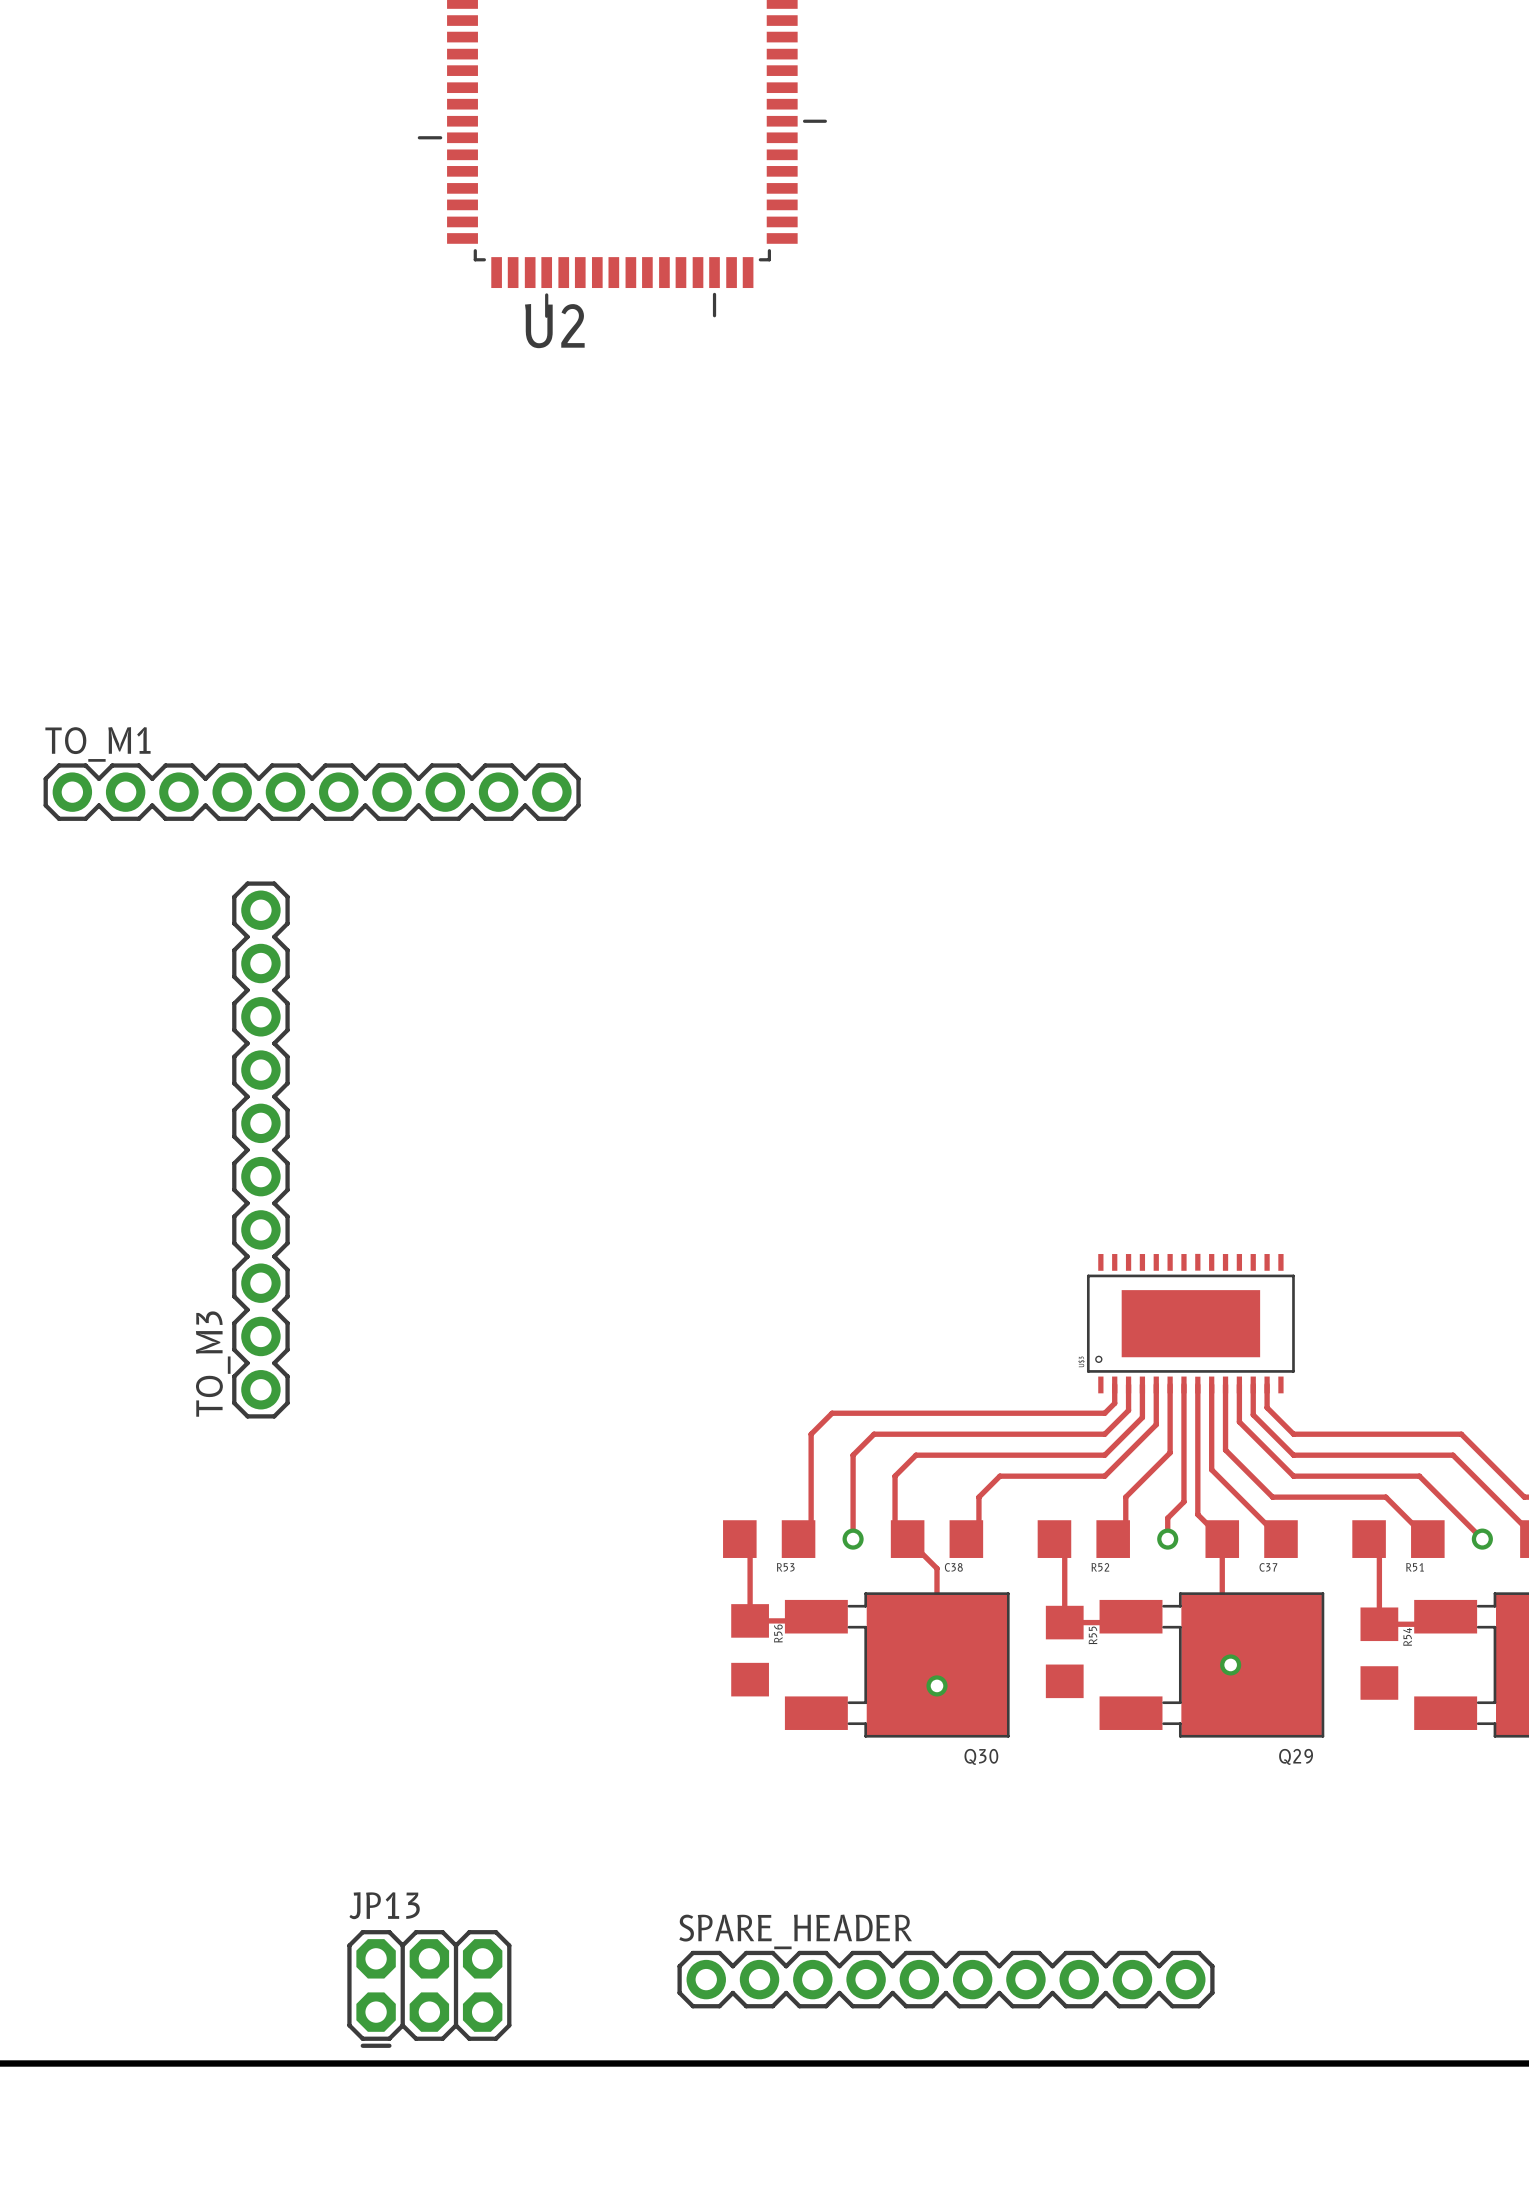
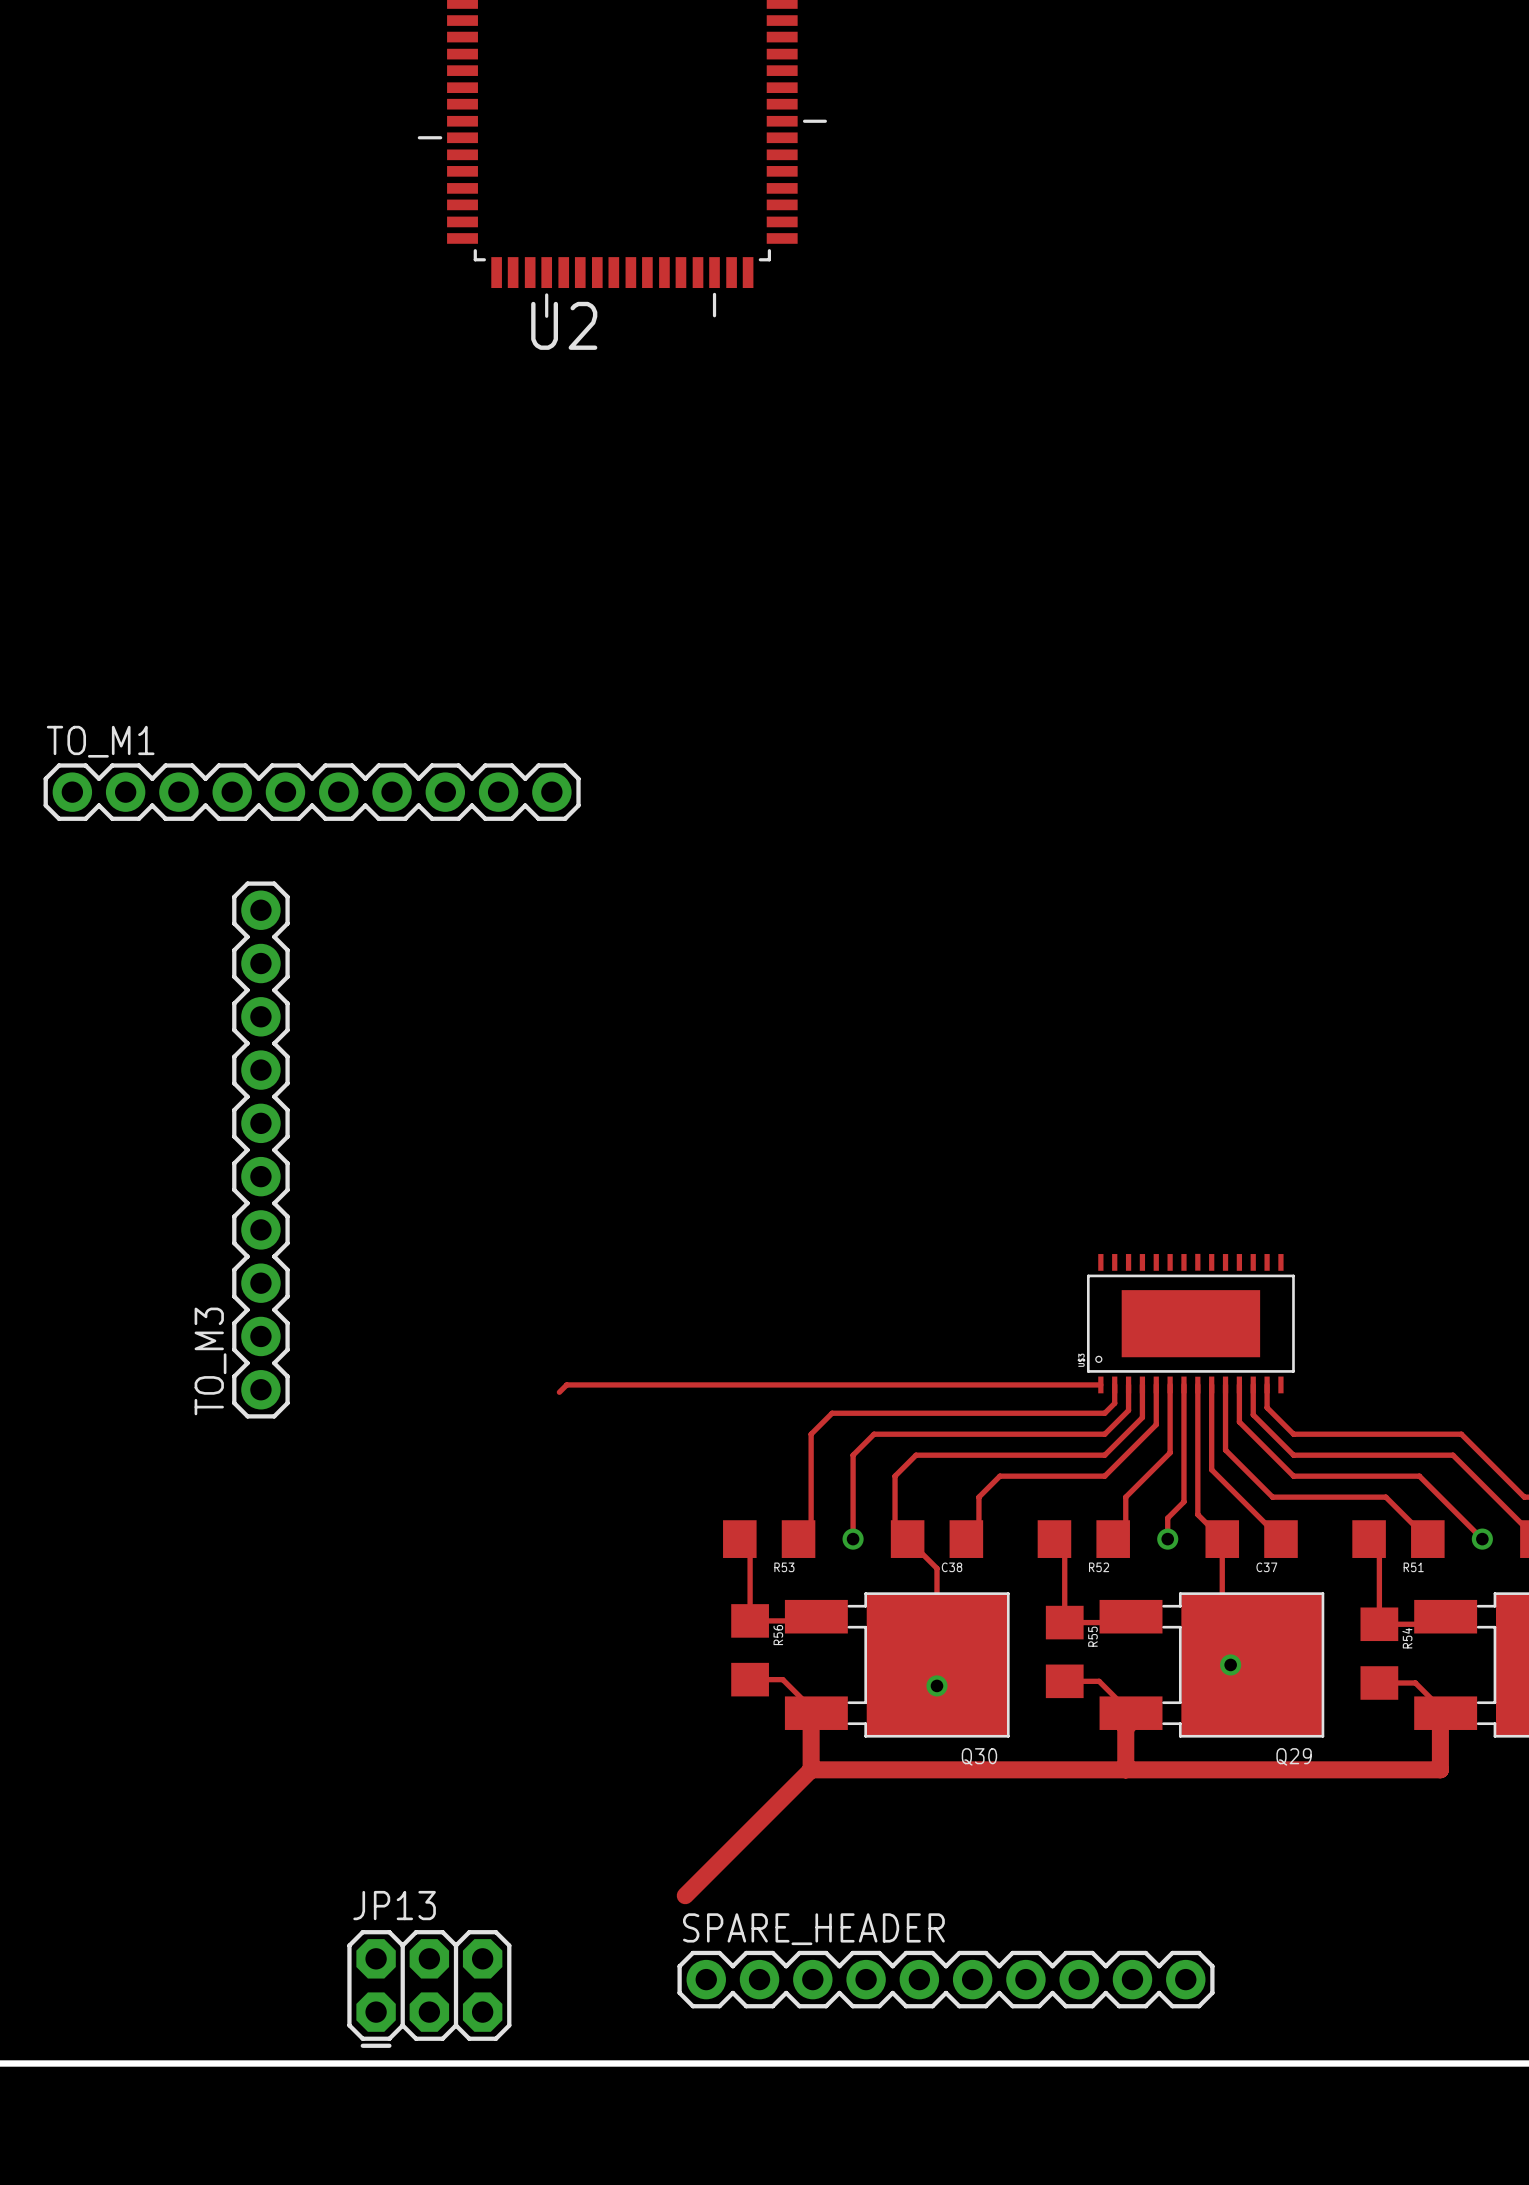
track: none -> (1100, 1384) (566, 1384) (559, 1392)
track: none -> (750, 1679) (782, 1679) (816, 1713) (811, 1718) (811, 1769)
track: none -> (1064, 1681) (1099, 1681) (1131, 1713) (1131, 1722) (1125, 1727) (1125, 1769)
track: none -> (1379, 1682) (1415, 1682) (1445, 1713) (1445, 1712) (1440, 1706) (1440, 1769) (811, 1769)
track: none -> (811, 1769) (685, 1895)

